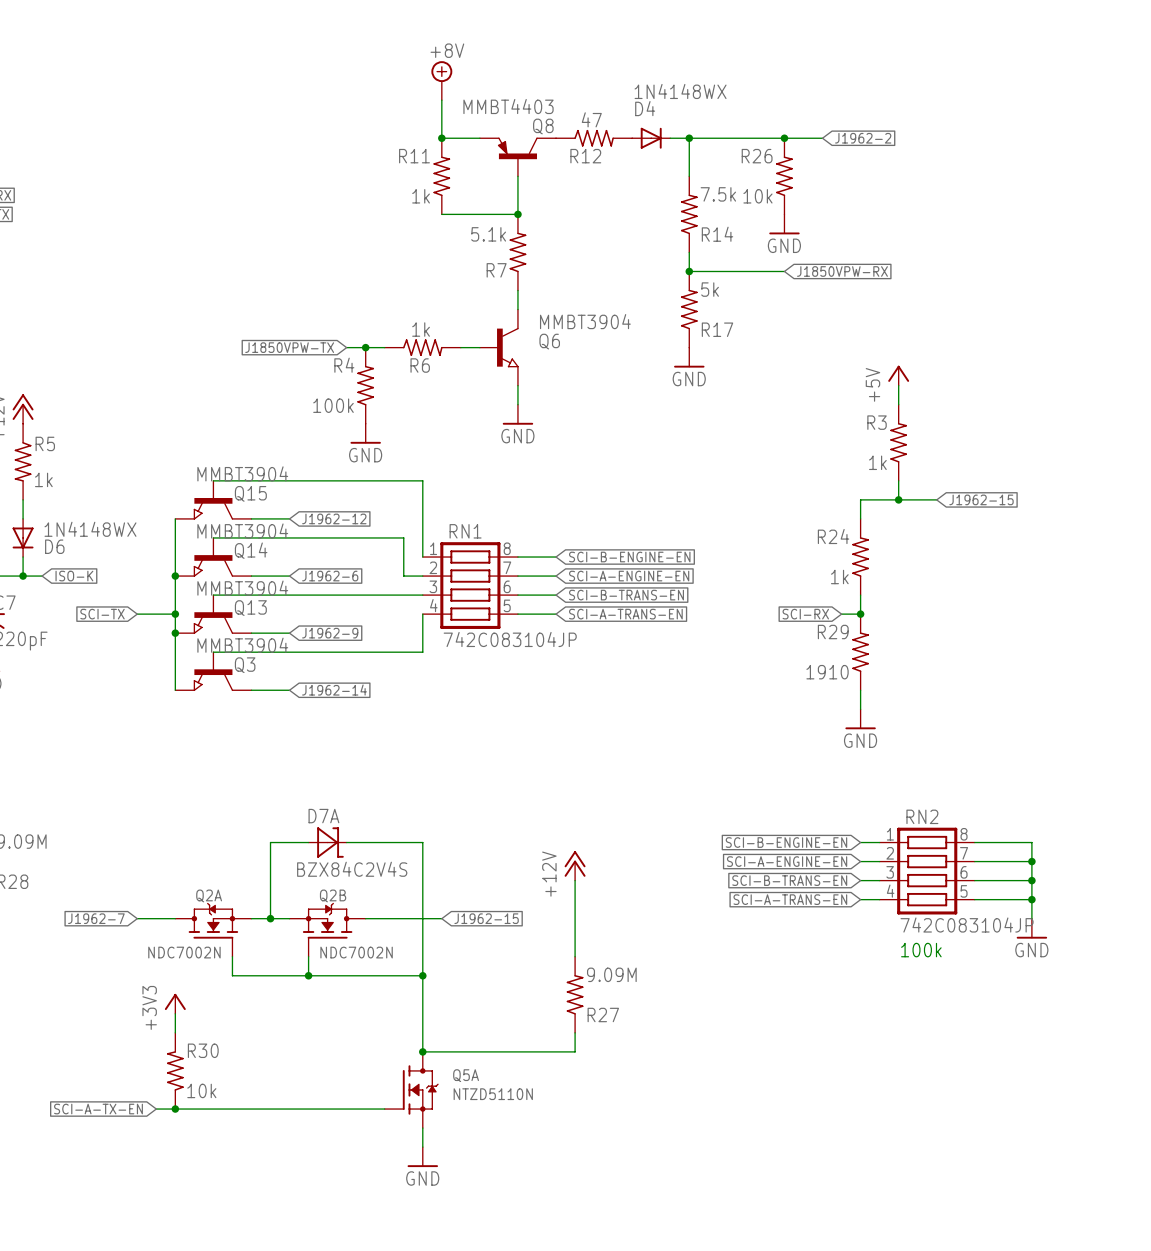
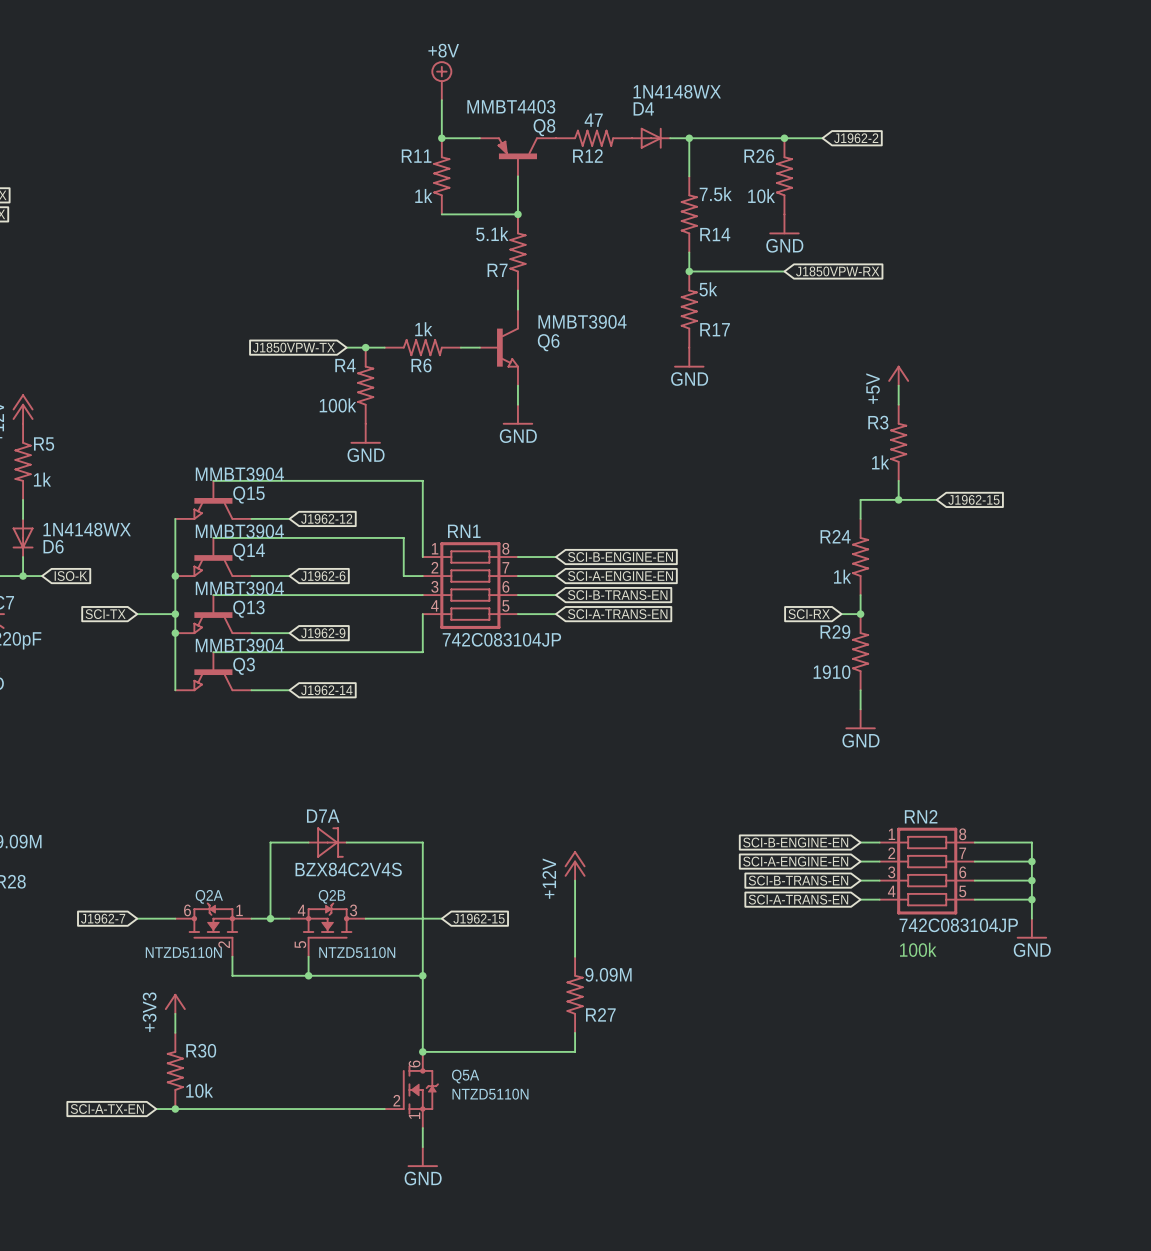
Q2A pin number: none -> 6 (187, 910)
Q2A pin number: none -> 1 (239, 910)
Q2B pin number: none -> 4 (301, 910)
Q2B pin number: none -> 3 (353, 910)
Q2B pin number: none -> 5 (300, 944)
Q2A pin number: none -> 2 (224, 944)
Q2A value: NDC7002N (184, 952) -> NTZD5110N (183, 952)
Q2B value: NDC7002N (356, 952) -> NTZD5110N (357, 952)
Q5A pin number: none -> 6 (414, 1063)
Q5A pin number: none -> 2 (396, 1100)
Q5A pin number: none -> 1 (414, 1115)

